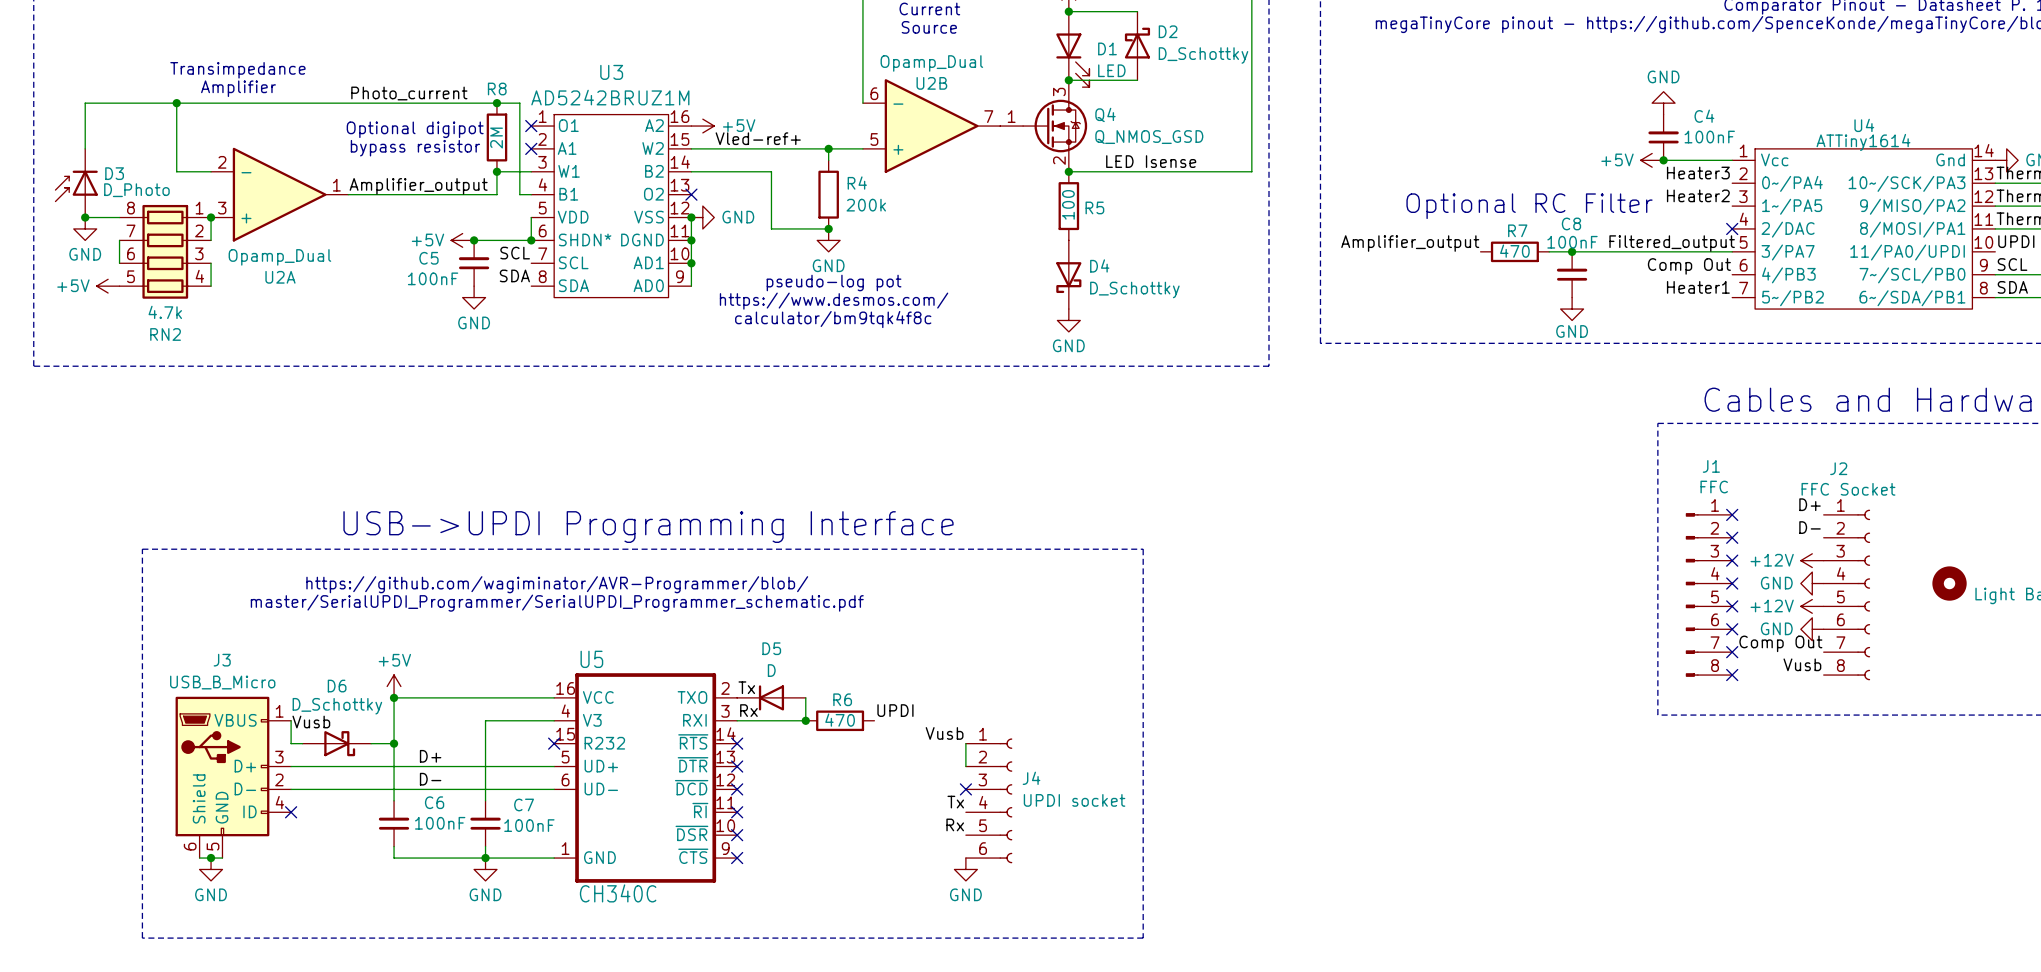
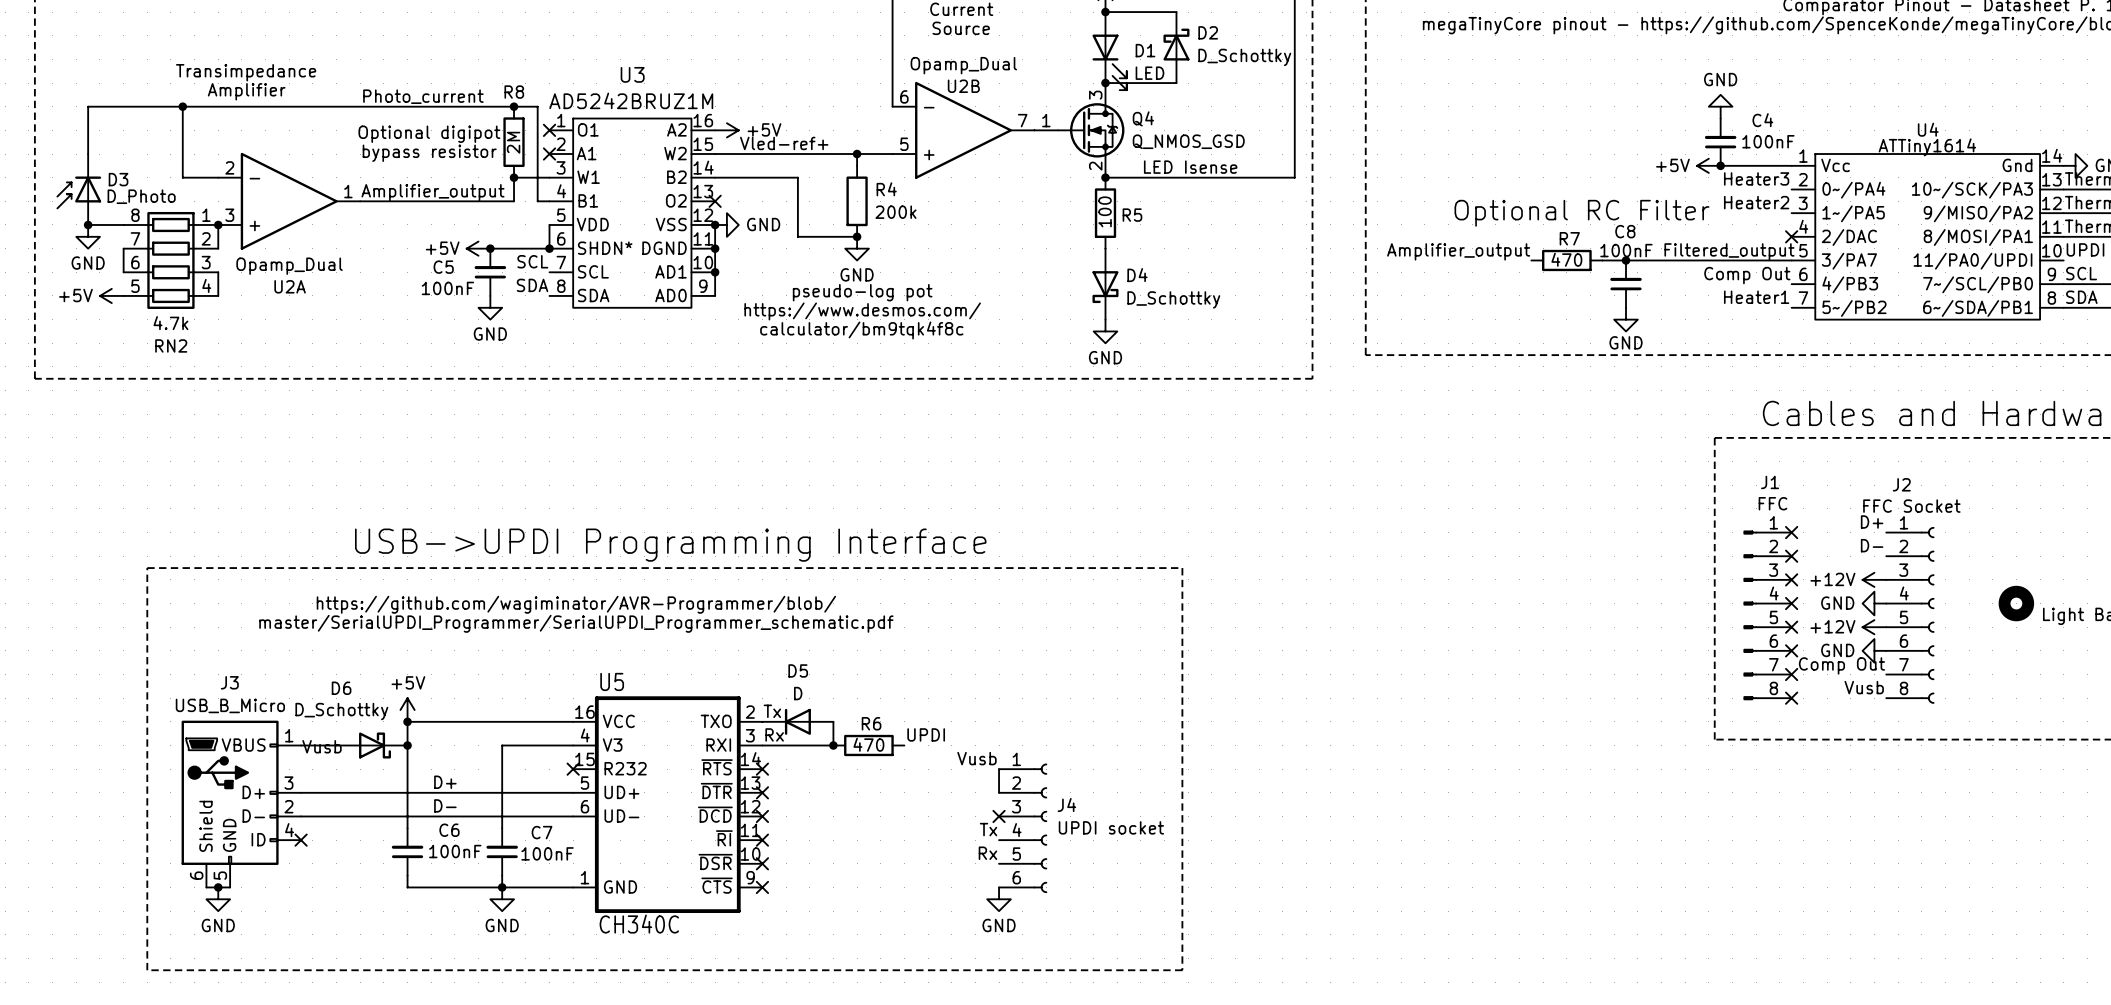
D6 name position: D6 (337, 686) -> D6 (341, 688)
D6 value position: D_Schottky (337, 706) -> D_Schottky (341, 711)
wire: (291, 720) (291, 743) (302, 743) -> (301, 745) (336, 745)
D6 position: (336, 743) -> (372, 745)
wire: (371, 743) (394, 743) -> none
junction position: (394, 743) -> (407, 745)

